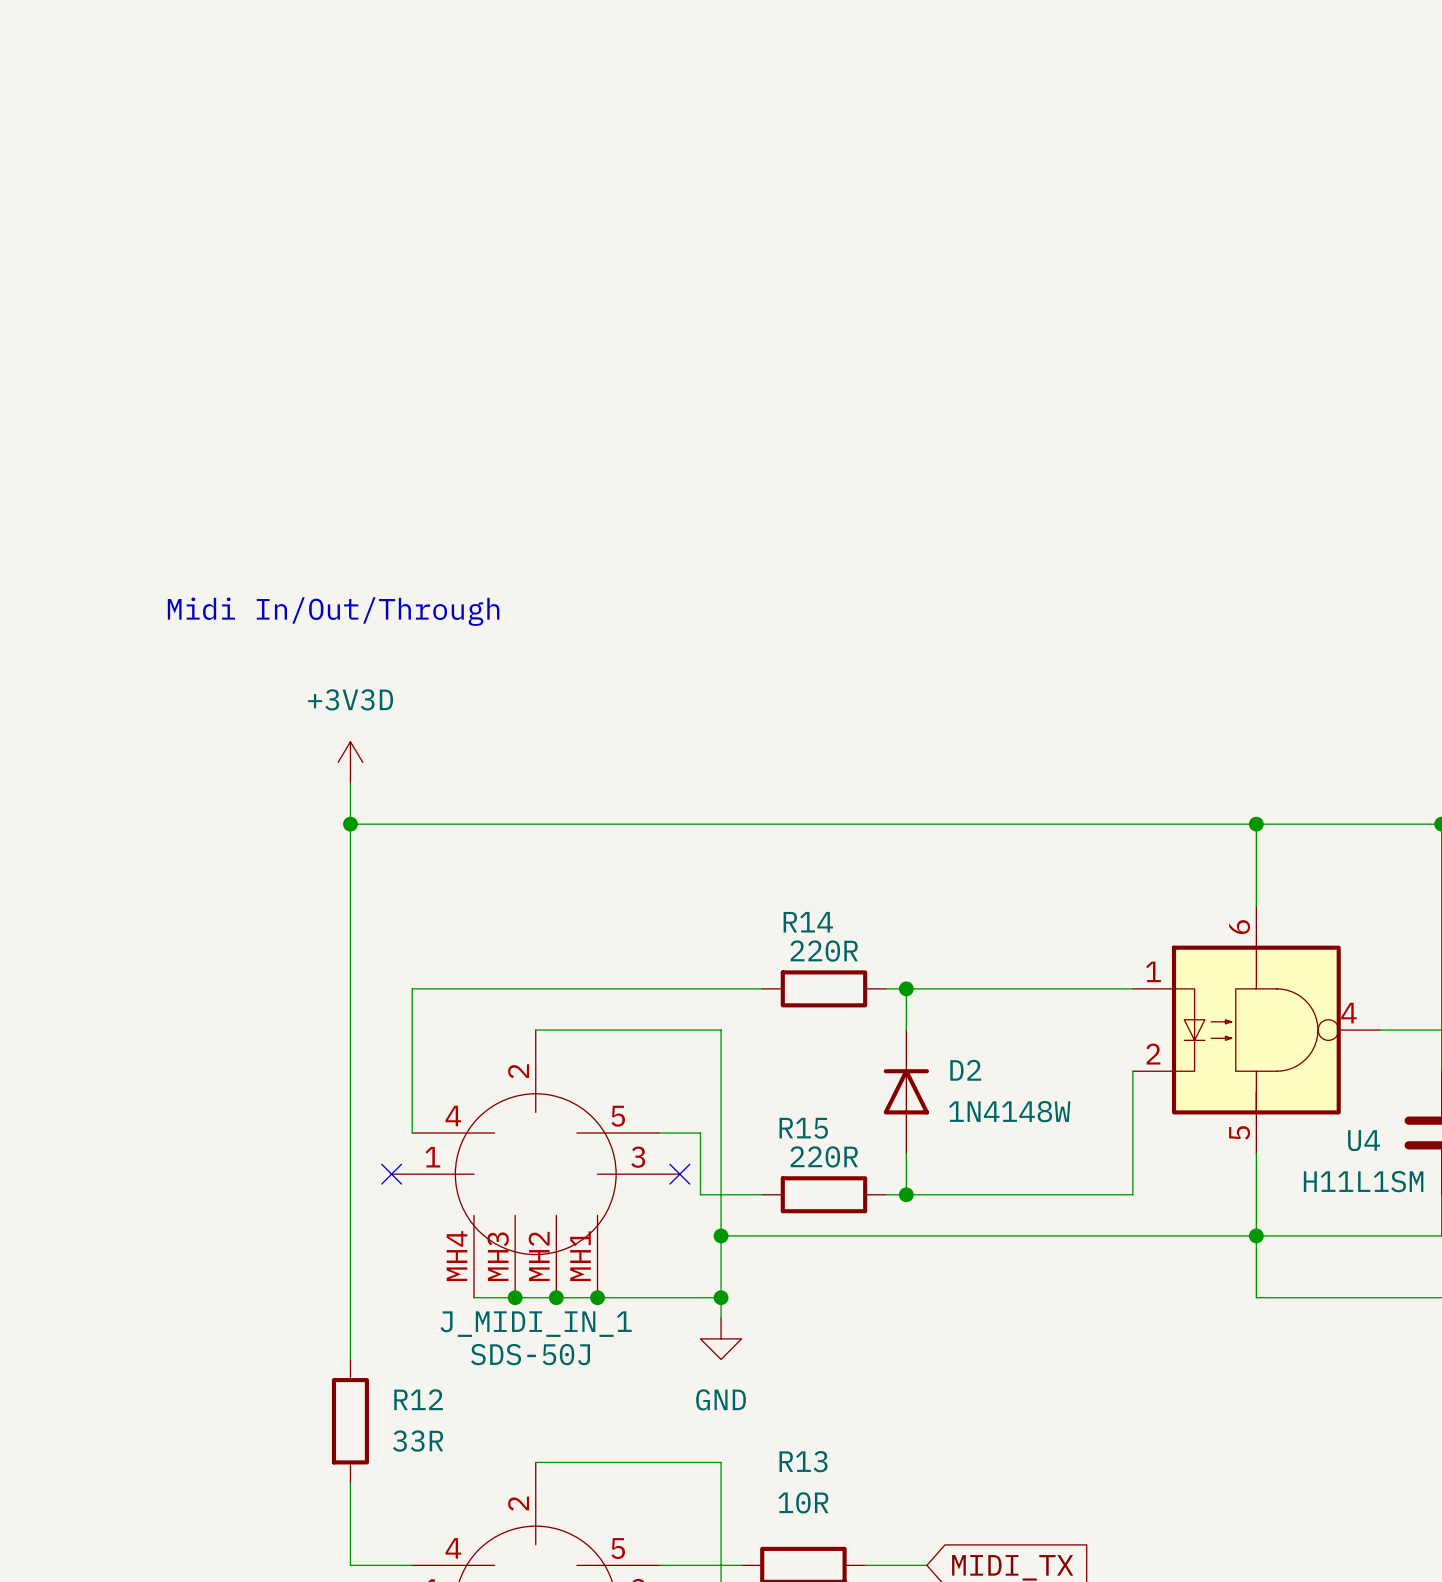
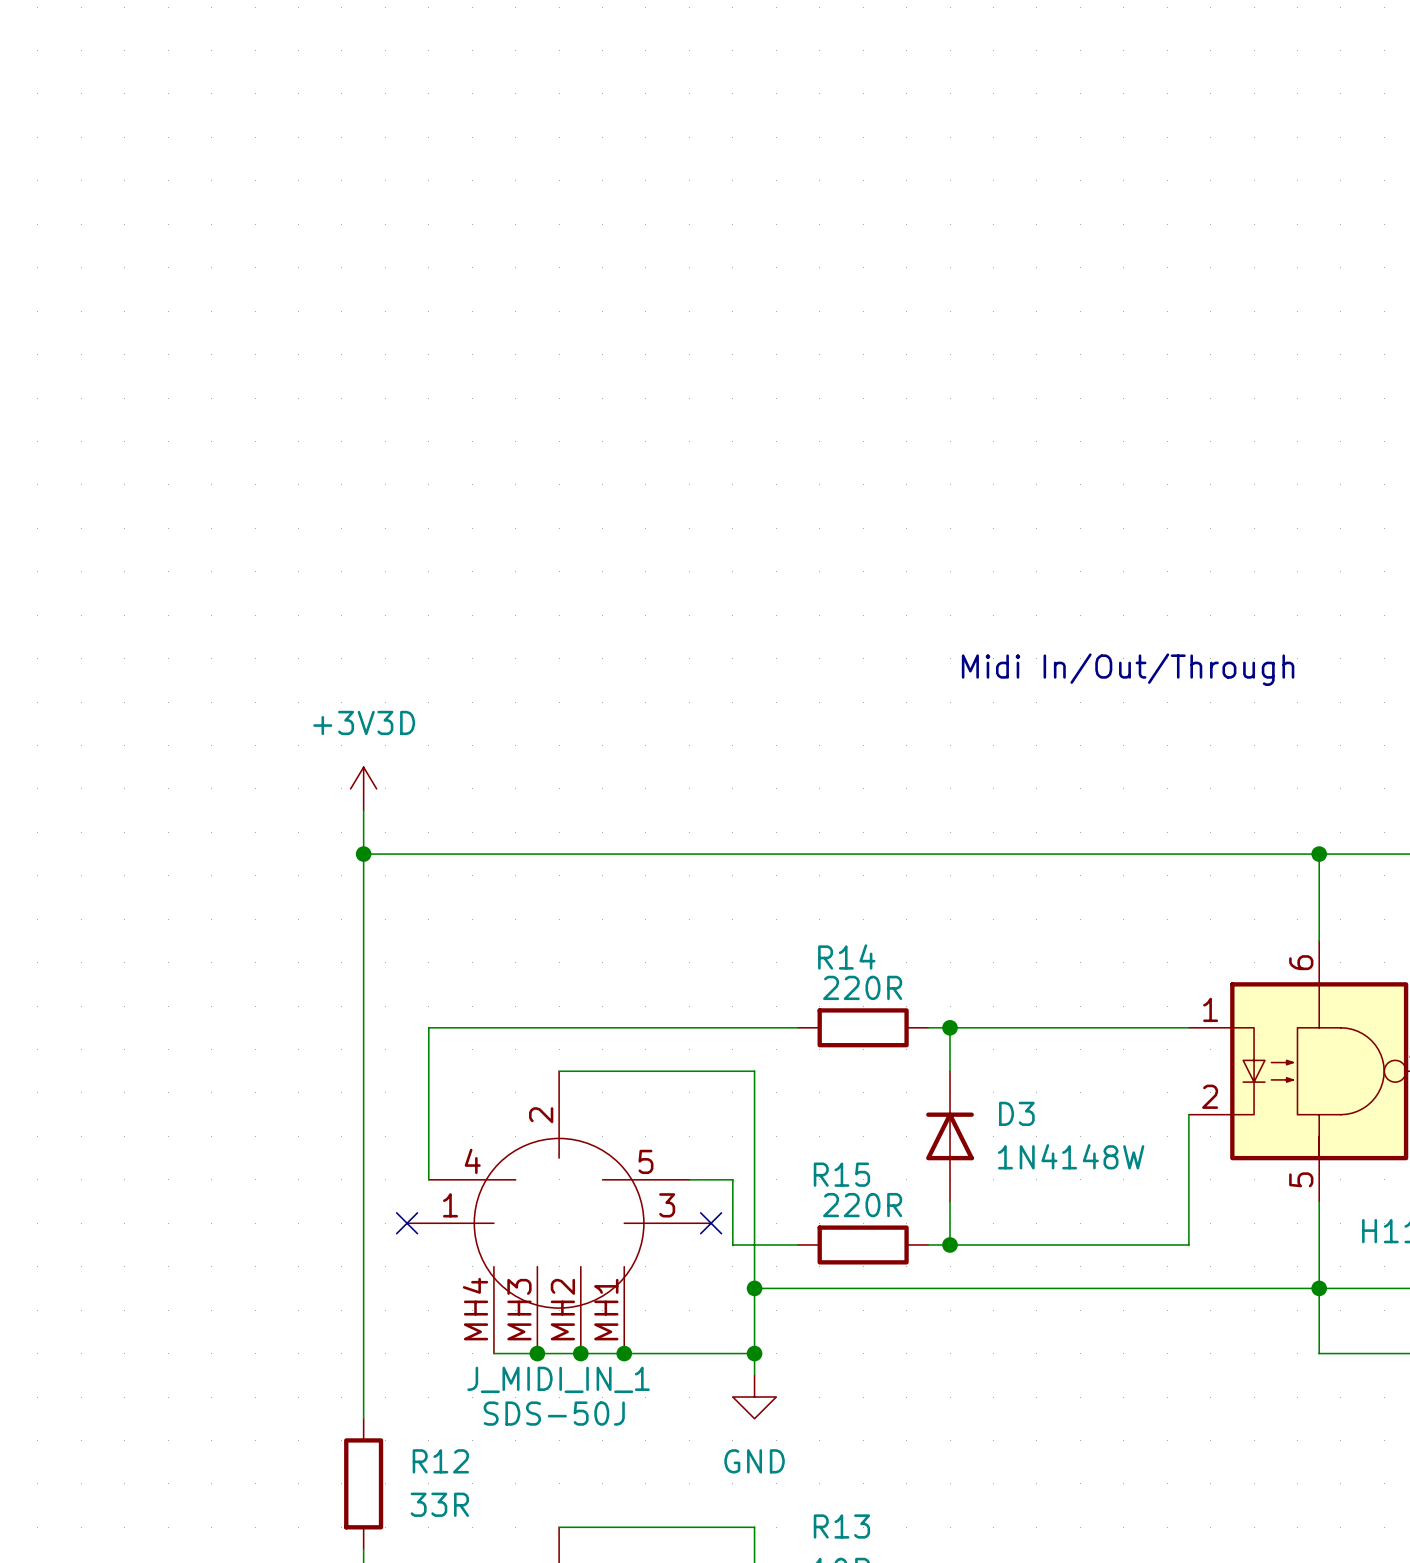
text: Midi In/Out/Through (333, 611) -> none
text: none -> Midi In/Out/Through (1128, 669)
D2 name: D2 (965, 1070) -> D3 (1016, 1113)

